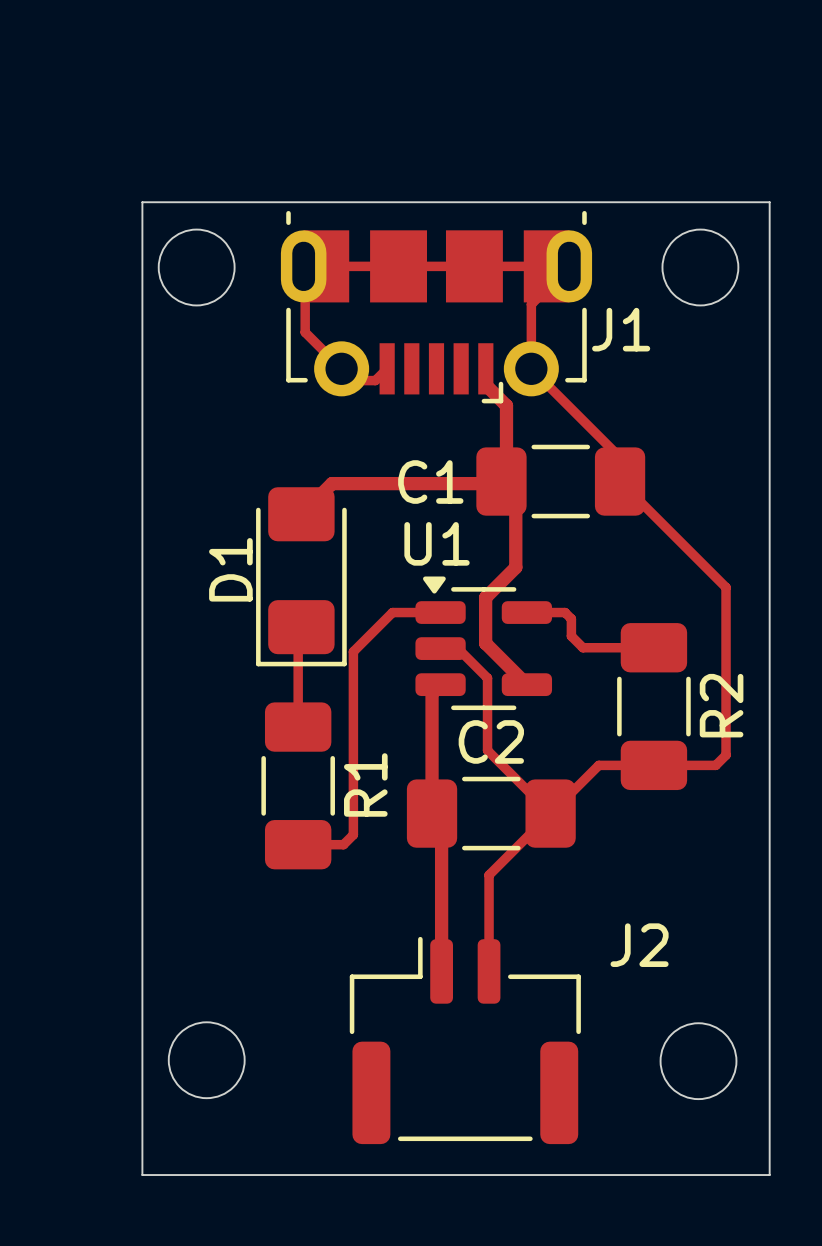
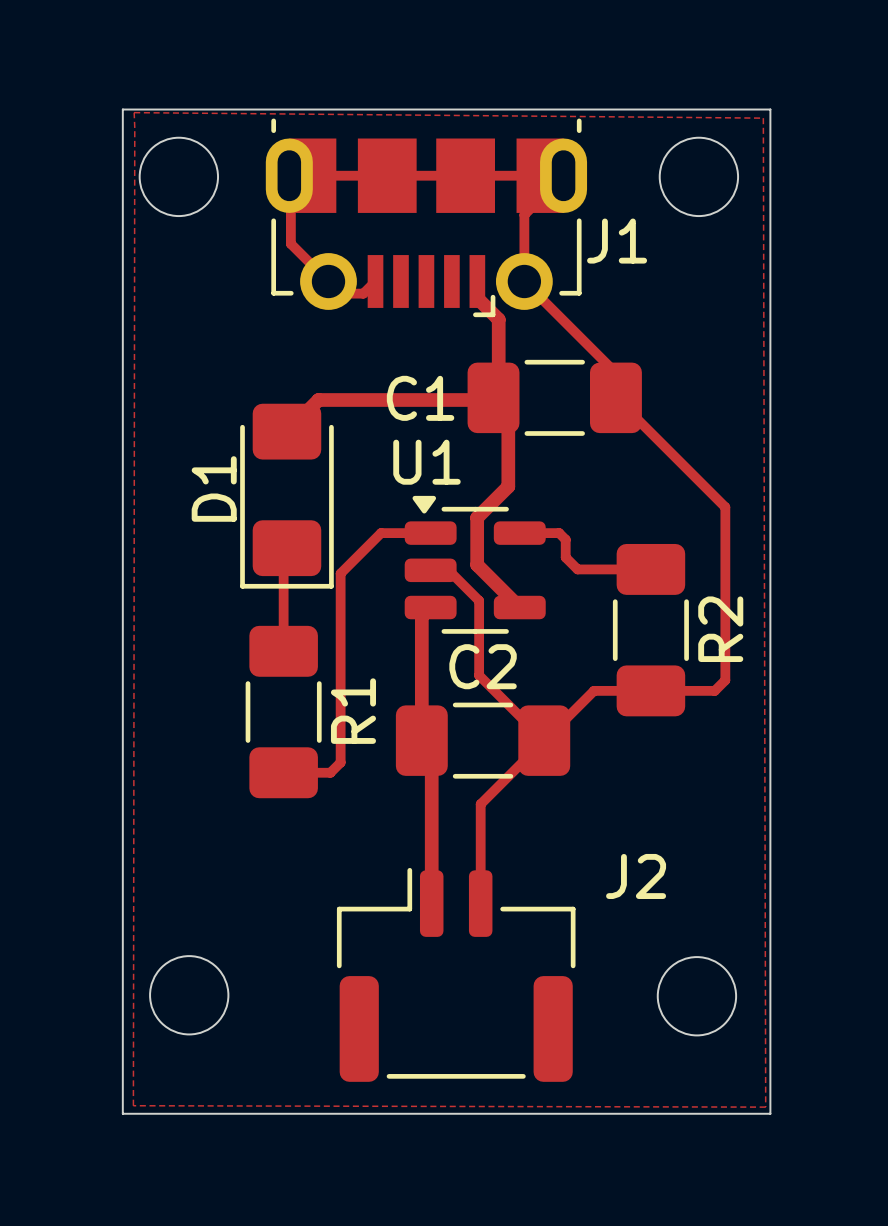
zone outline: none -> (134, 112) (763, 118) (765, 1107) (133, 1105) (134, 112)

